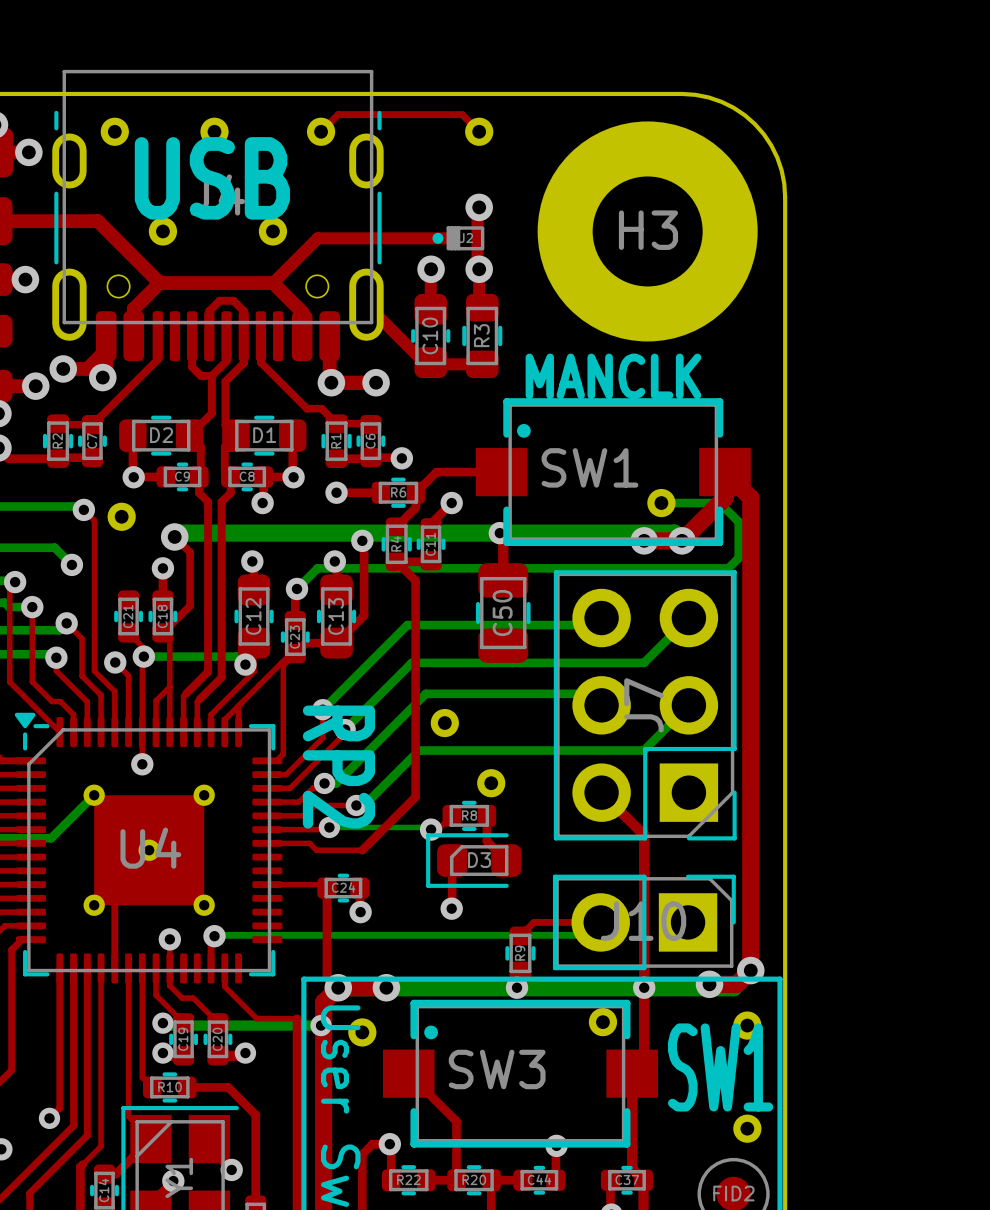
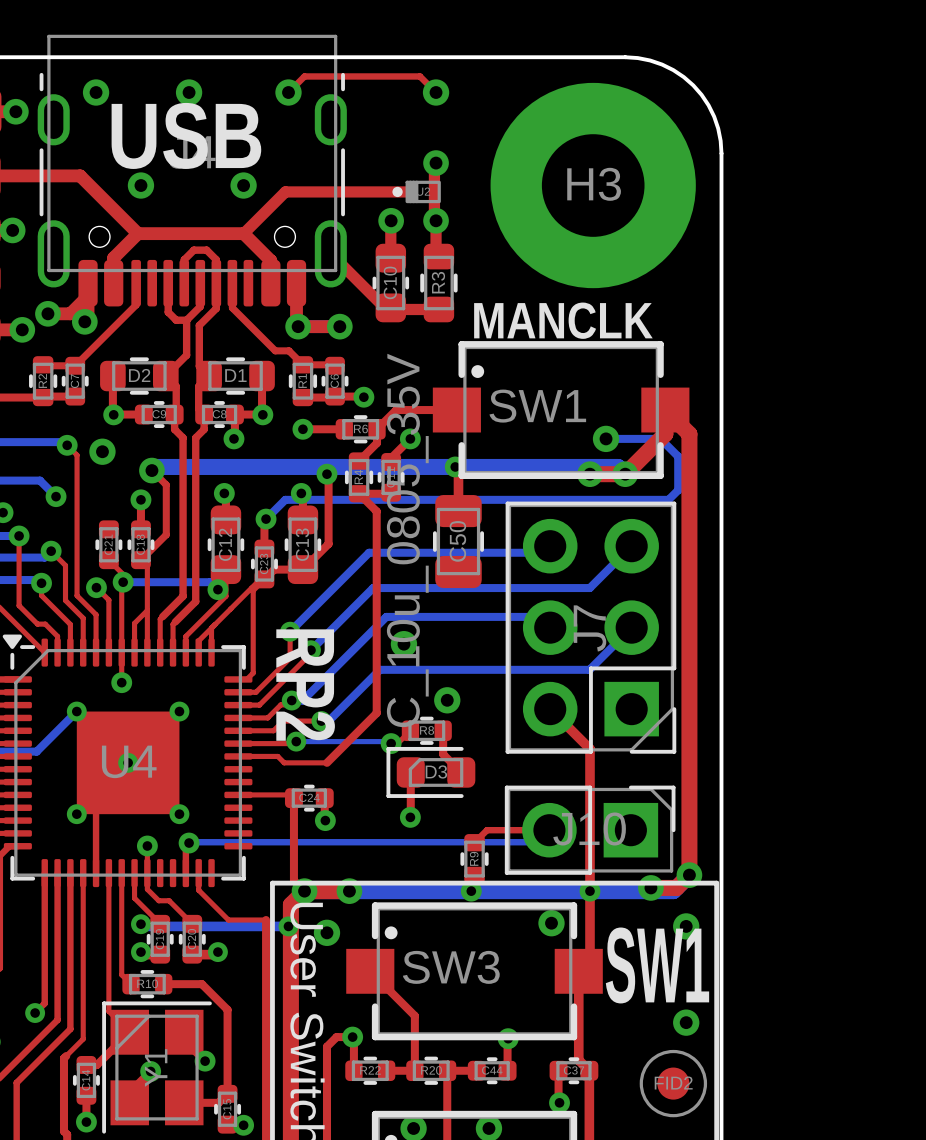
C50 value: none -> C_10u_0805_35V (407, 540)

